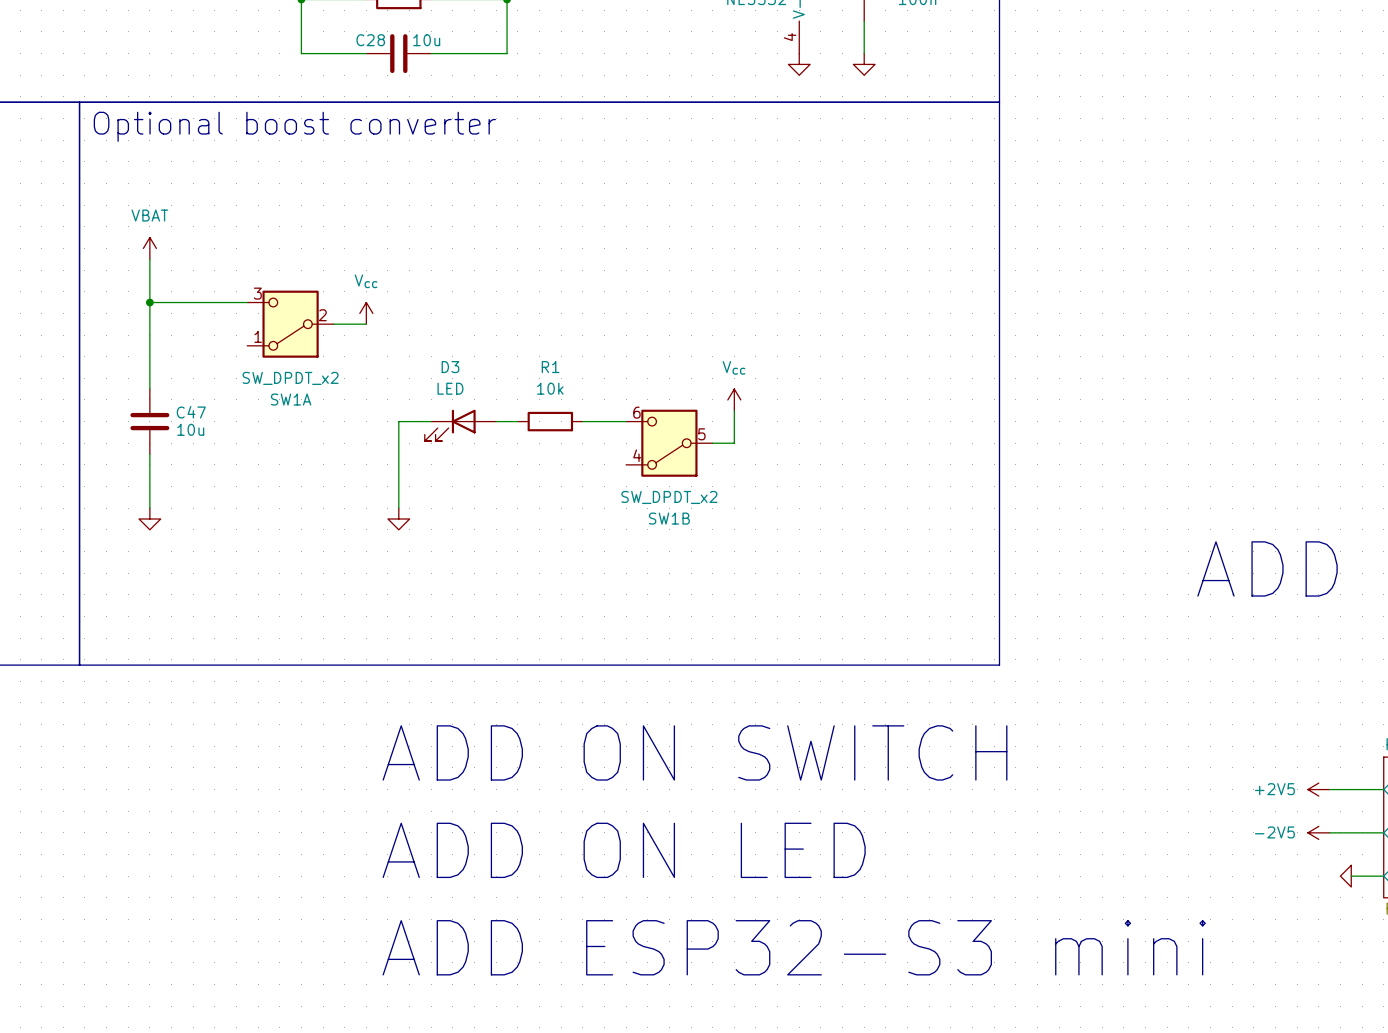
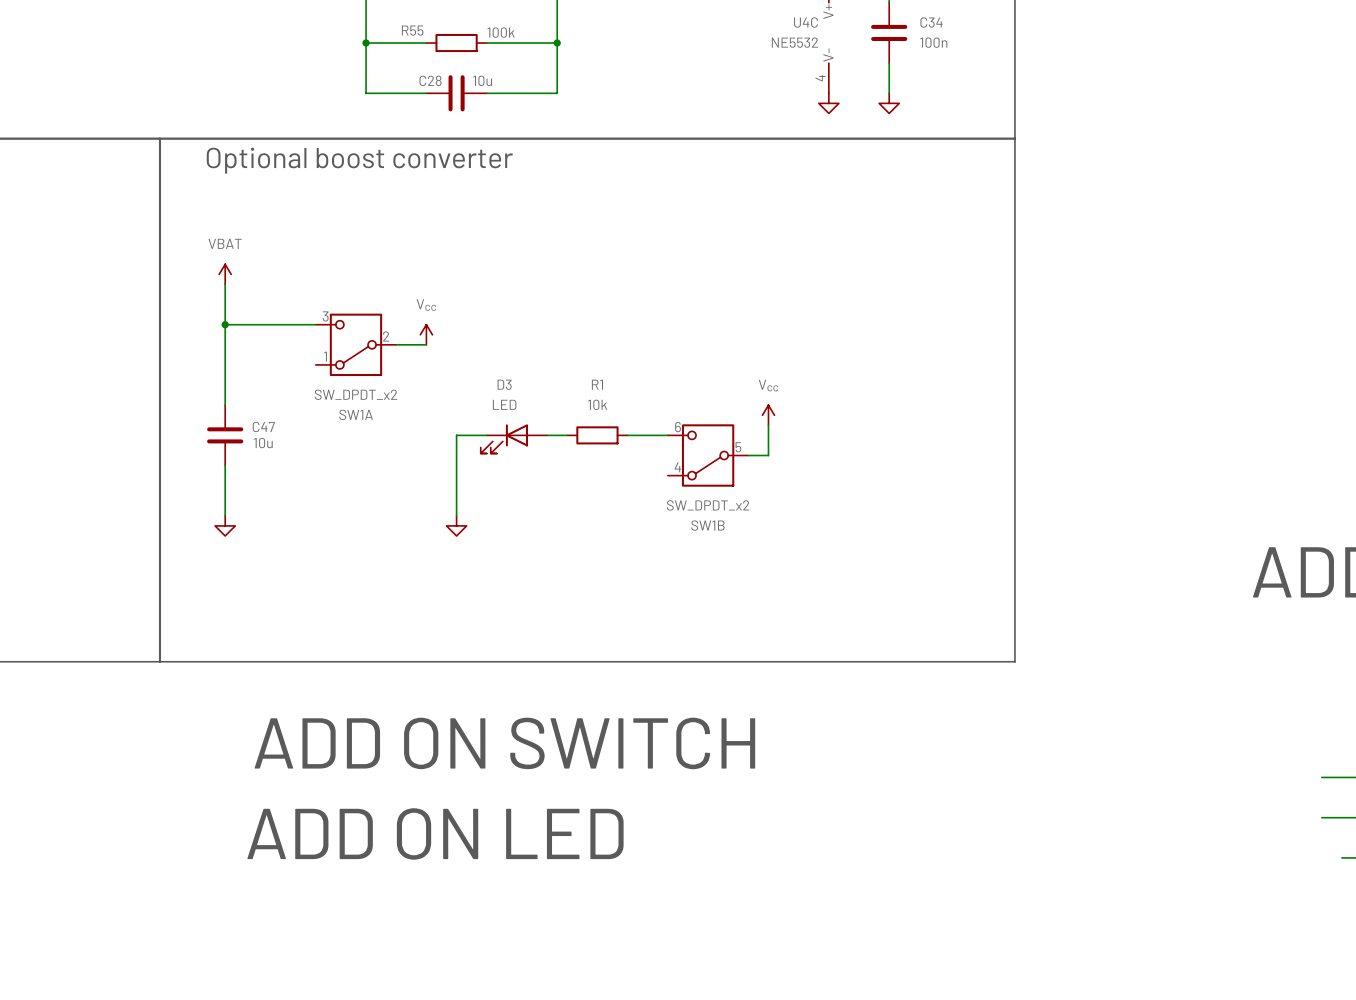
text position: ADD ON SWITCH (694, 752) -> ADD ON SWITCH (504, 743)
power symbol: +2V5 (1318, 789) -> none
power symbol: -2V5 (1318, 832) -> none
text position: ADD ON LED (624, 850) -> ADD ON LED (435, 833)
power symbol: (1345, 876) -> none
text: ADD ESP32-S3 mini (794, 947) -> none

